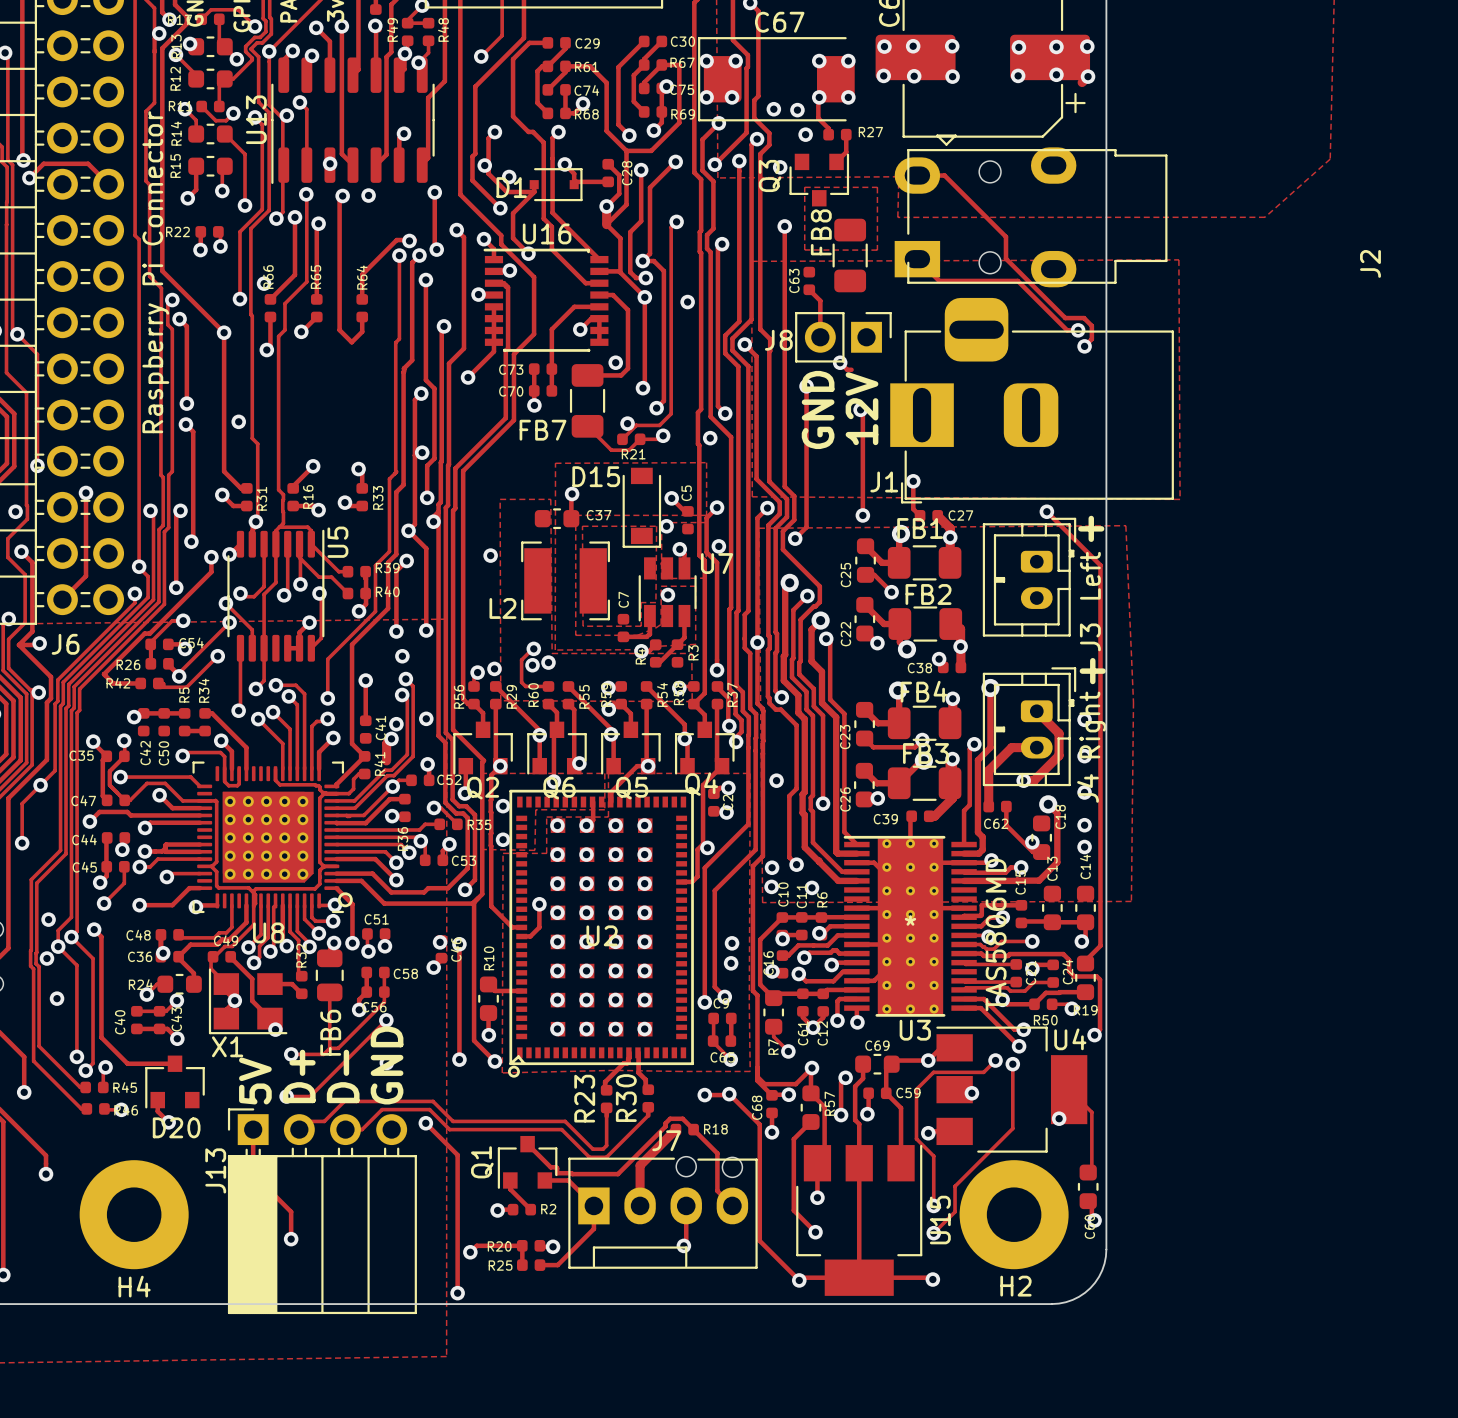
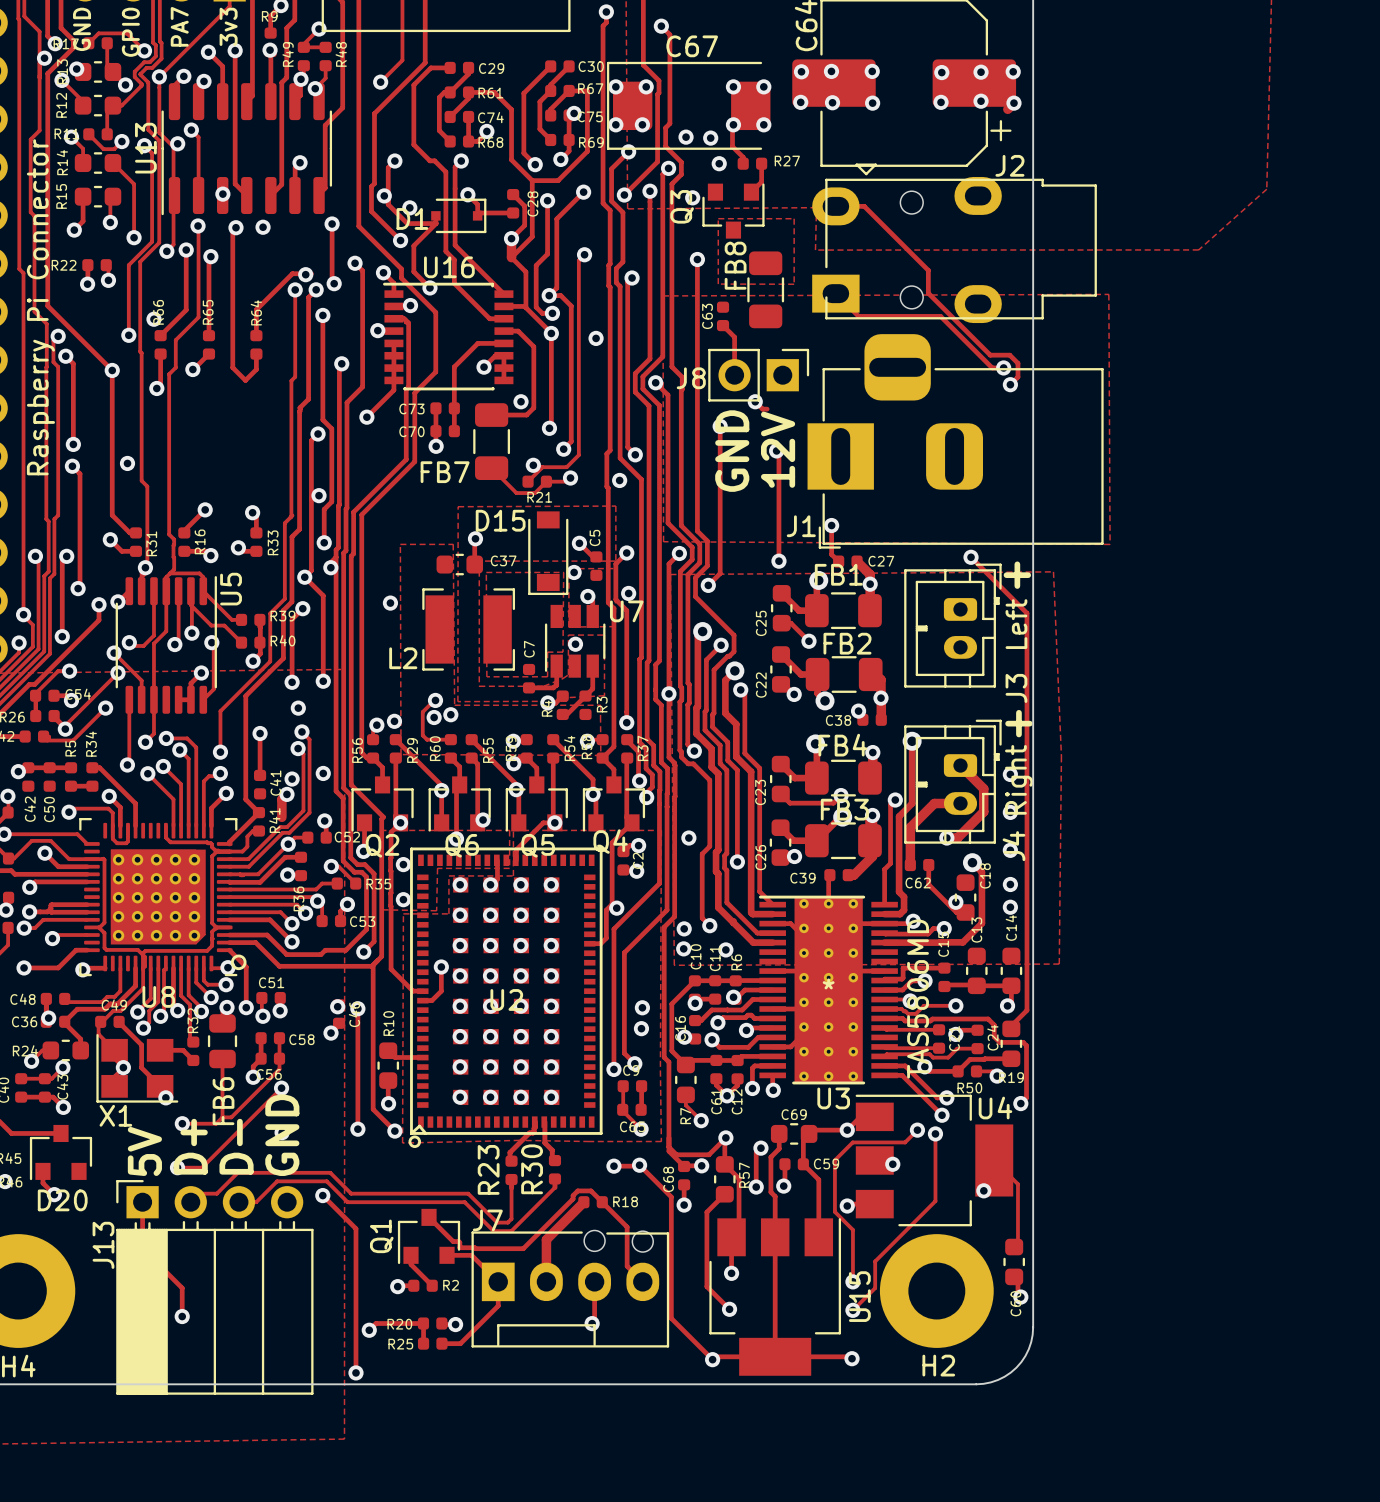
J2 name rotation: 0° (1370, 263) -> 90° clockwise (1009, 165)
J2 name position: J2 (1370, 263) -> J2 (1009, 165)
J7 name position: J7 (666, 1140) -> J7 (487, 1220)

